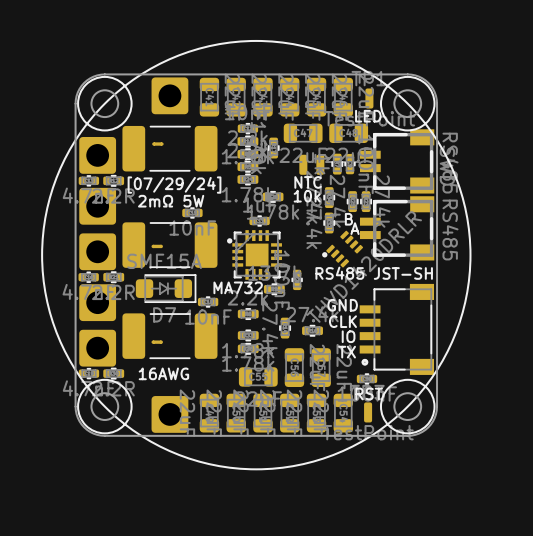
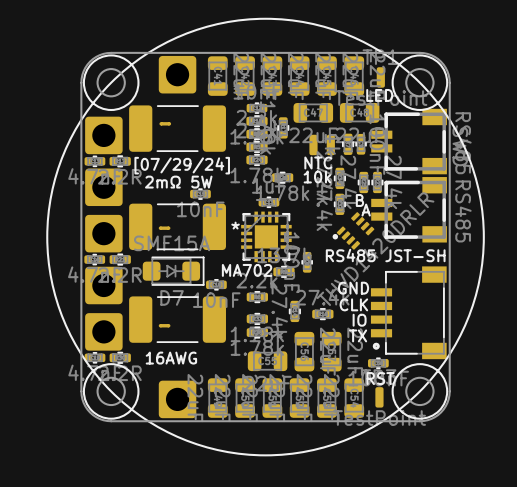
part footprint: [227, 230, 282, 280] -> [241, 211, 292, 263]
text: MA732 (238, 287) -> MA702 (247, 270)

